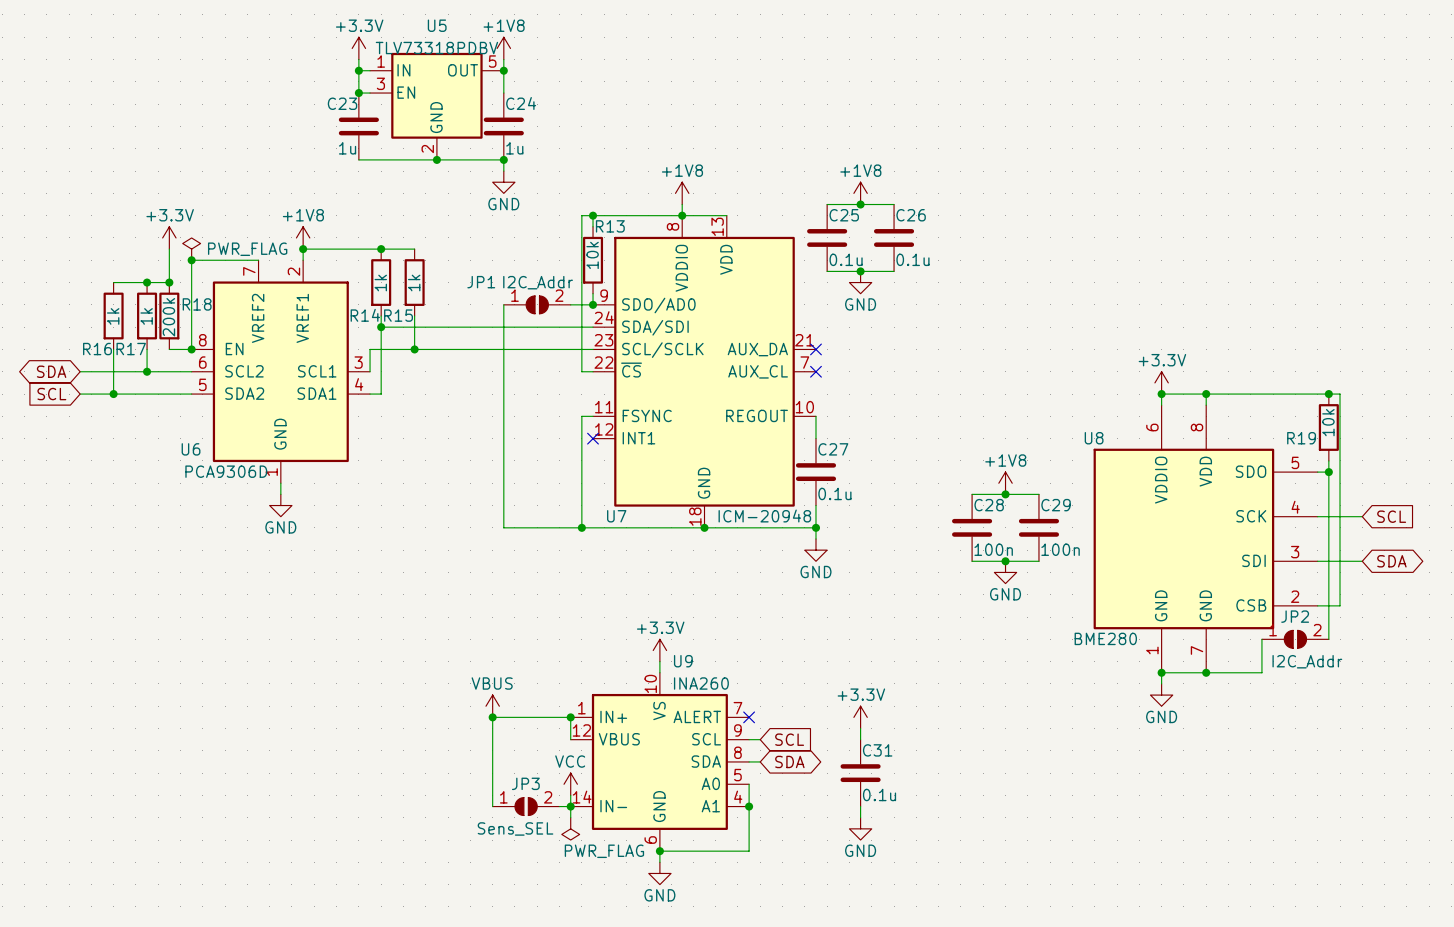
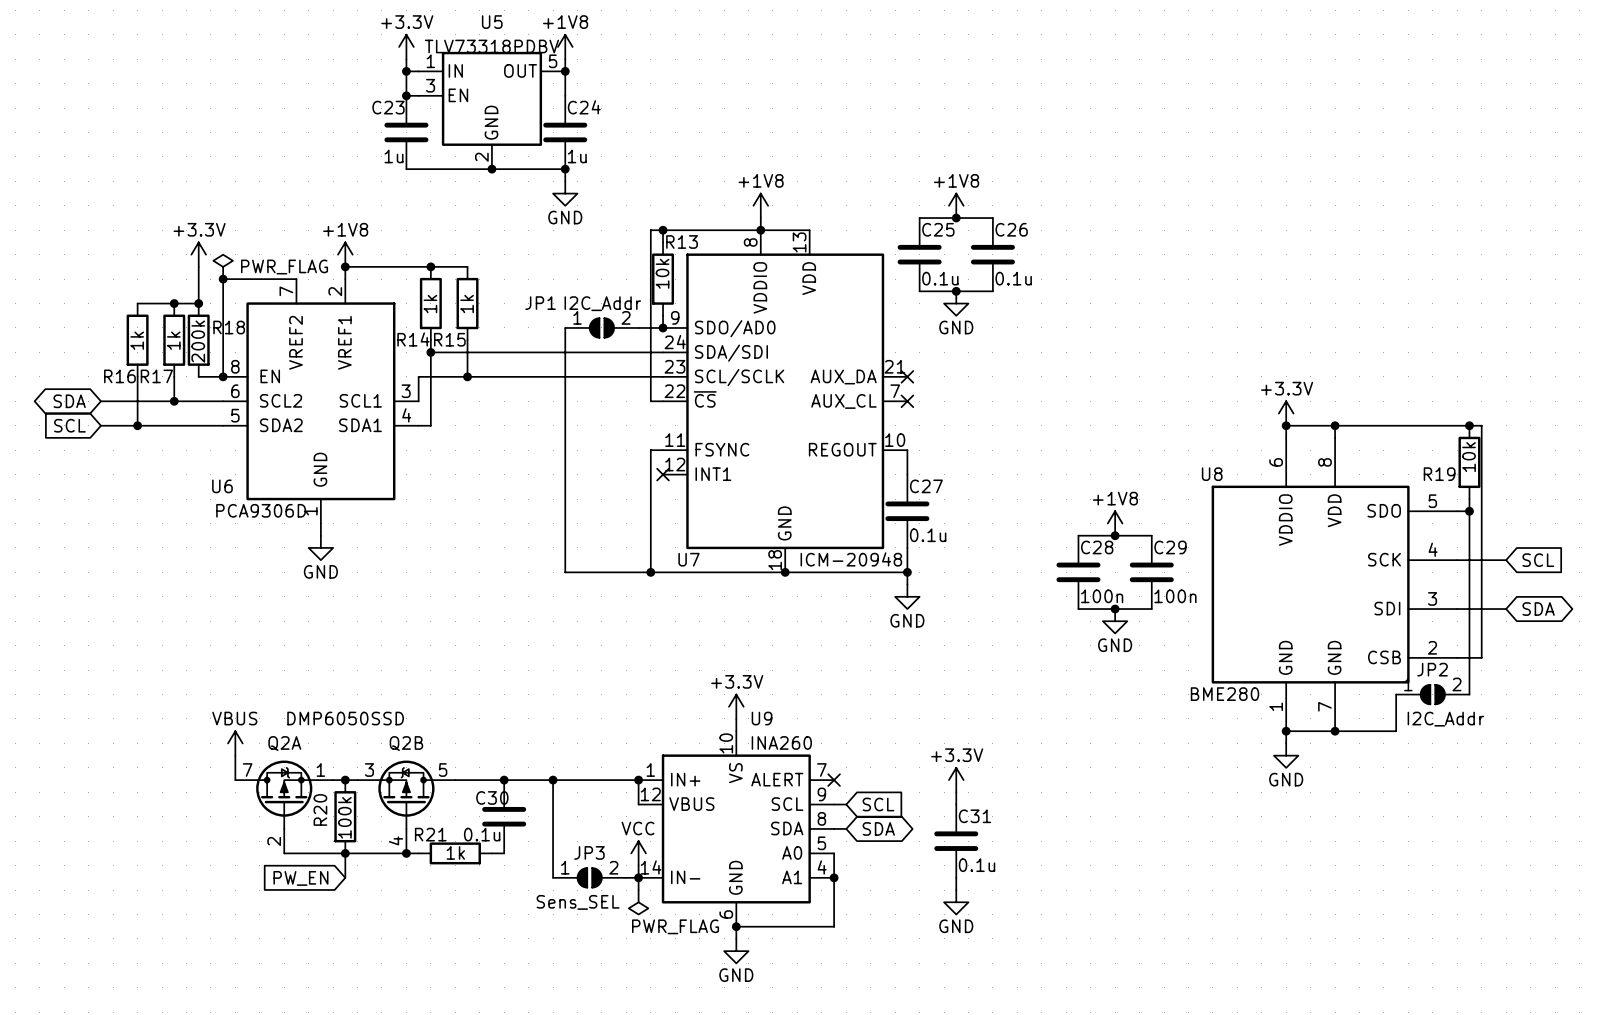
power symbol: none -> VBUS (235, 743)
wire: none -> (235, 755) (235, 780)
power symbol: VBUS (492, 706) -> none
wire: none -> (333, 780) (357, 780)
junction: none -> (345, 780)
wire: none -> (455, 780) (553, 780)
junction: none -> (504, 780)
Q2A: none -> DMP6050SSD (284, 806)
Q2B: none -> (406, 806)
R20: none -> 100k (345, 816)
C30: none -> 0.1u (504, 816)
wire: none -> (284, 853) (418, 853)
wire: none -> (345, 853) (345, 877)
junction: none -> (345, 853)
junction: none -> (406, 853)
R21: none -> 1k (455, 853)
wire: none -> (491, 853) (504, 853)
global label: none -> PW_EN (300, 878)

